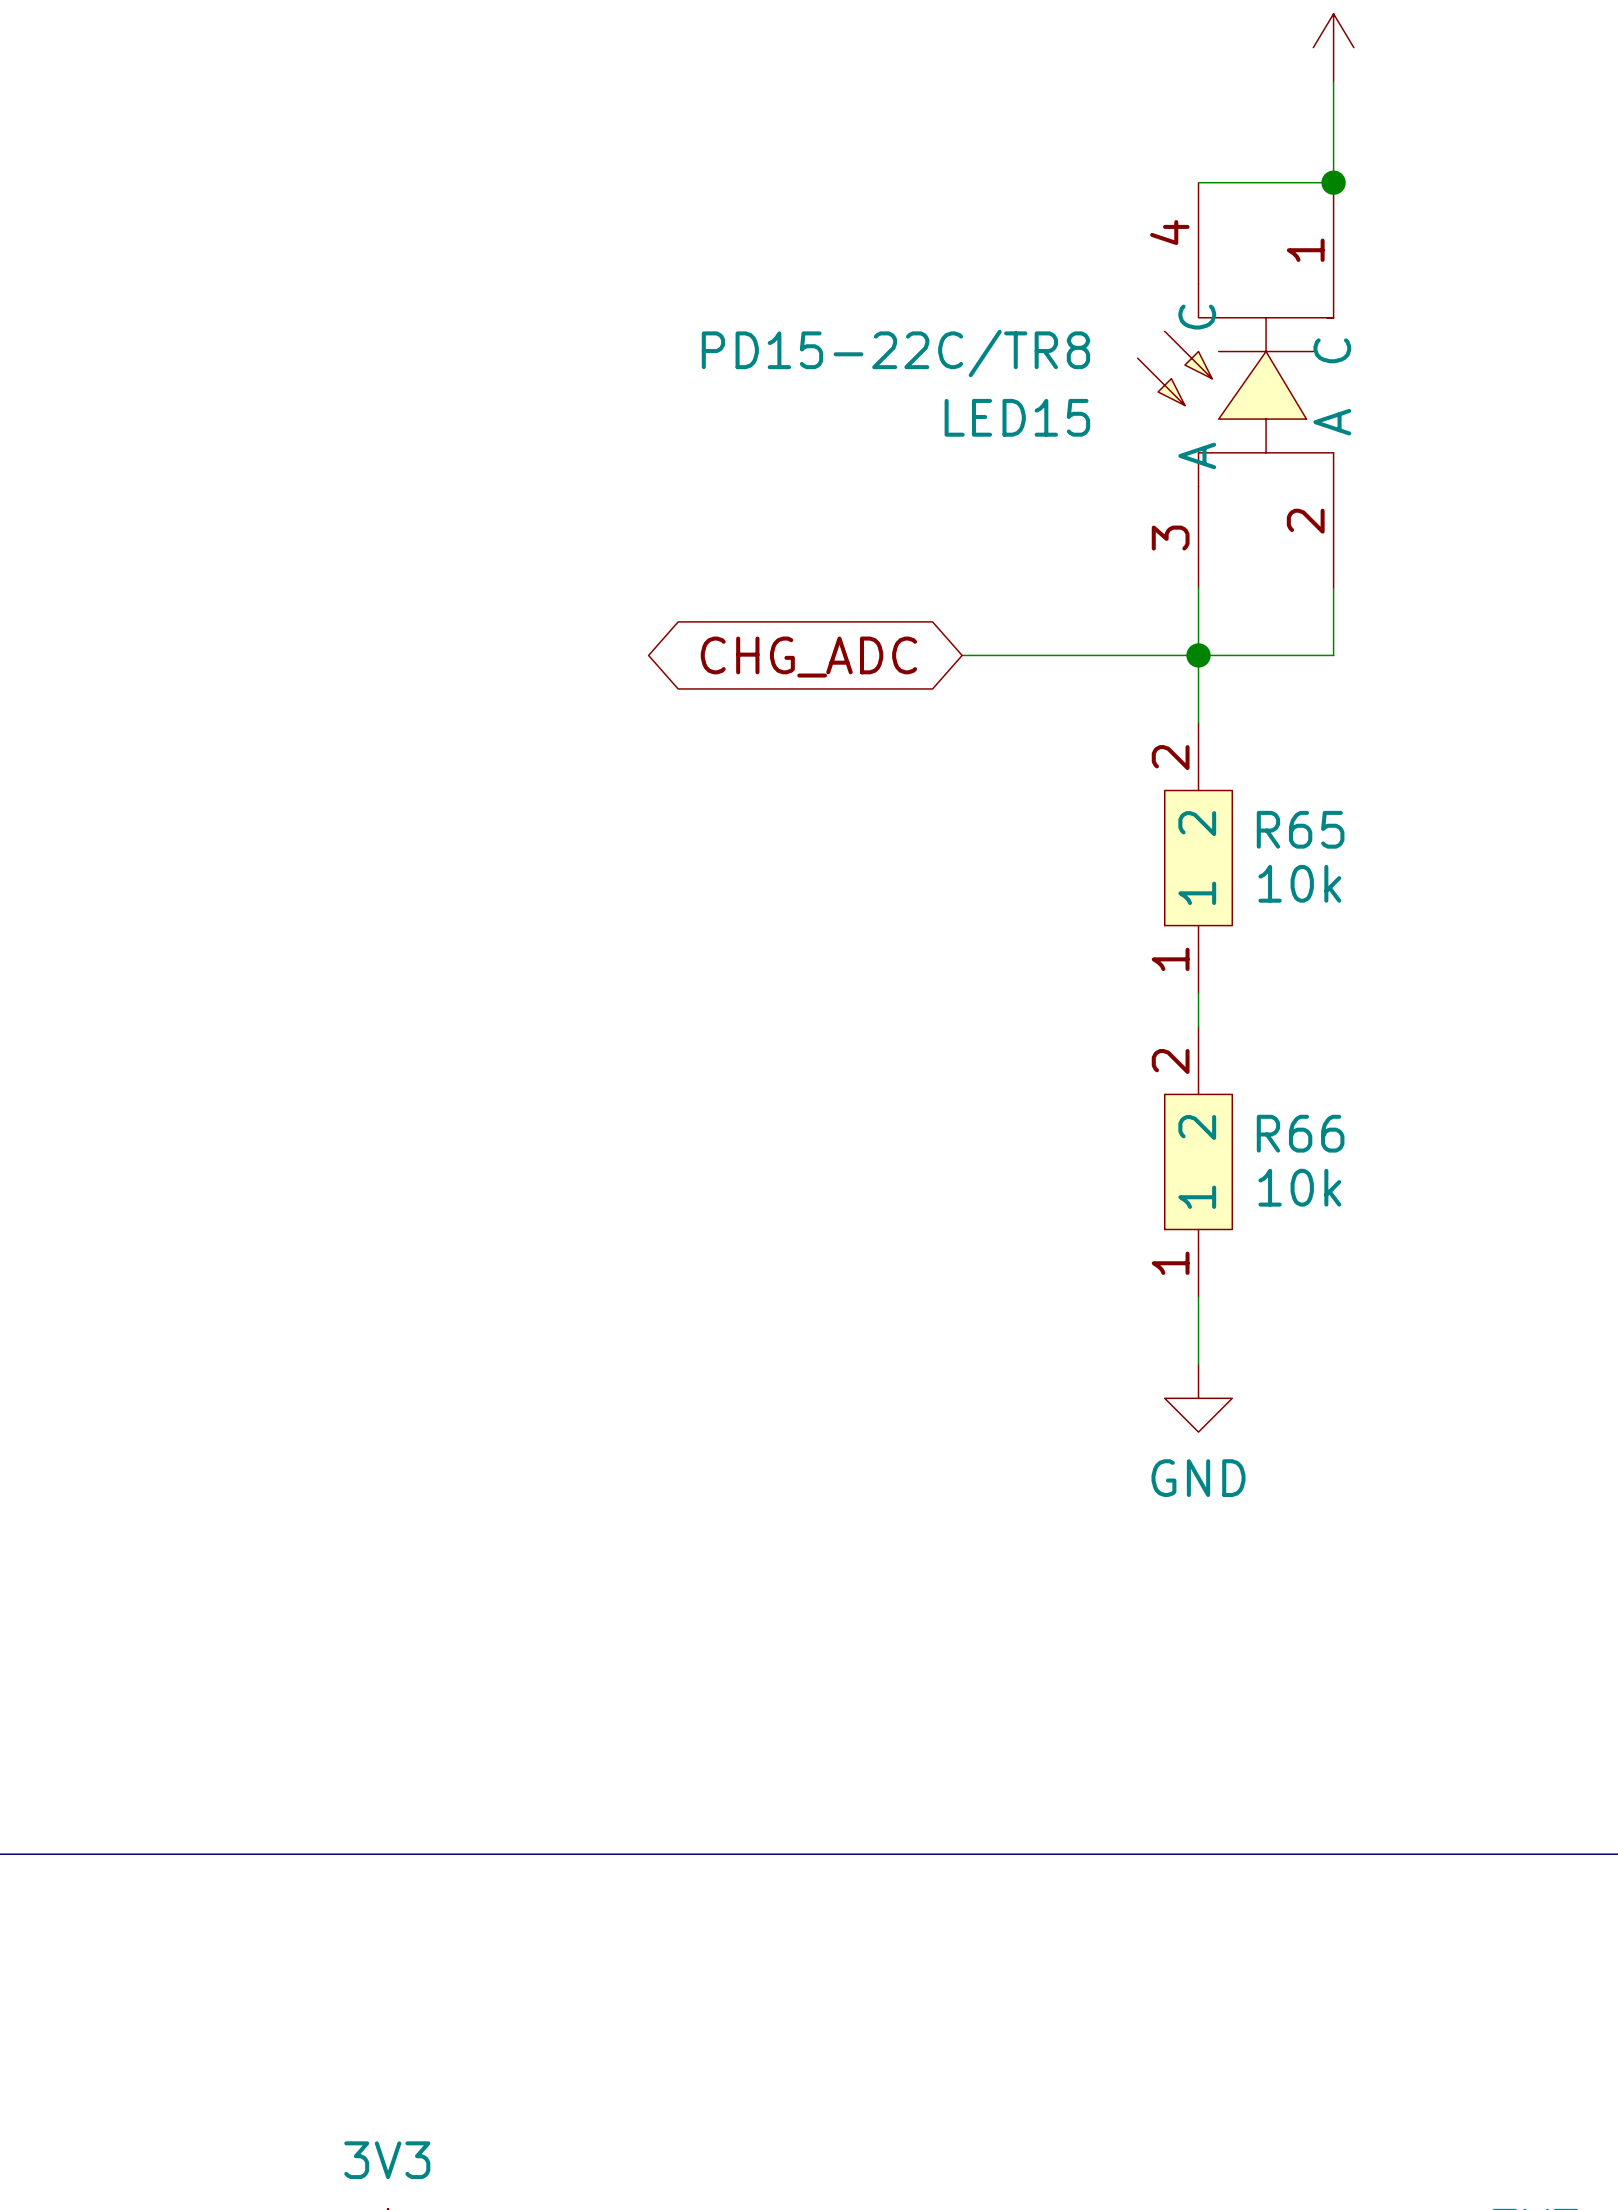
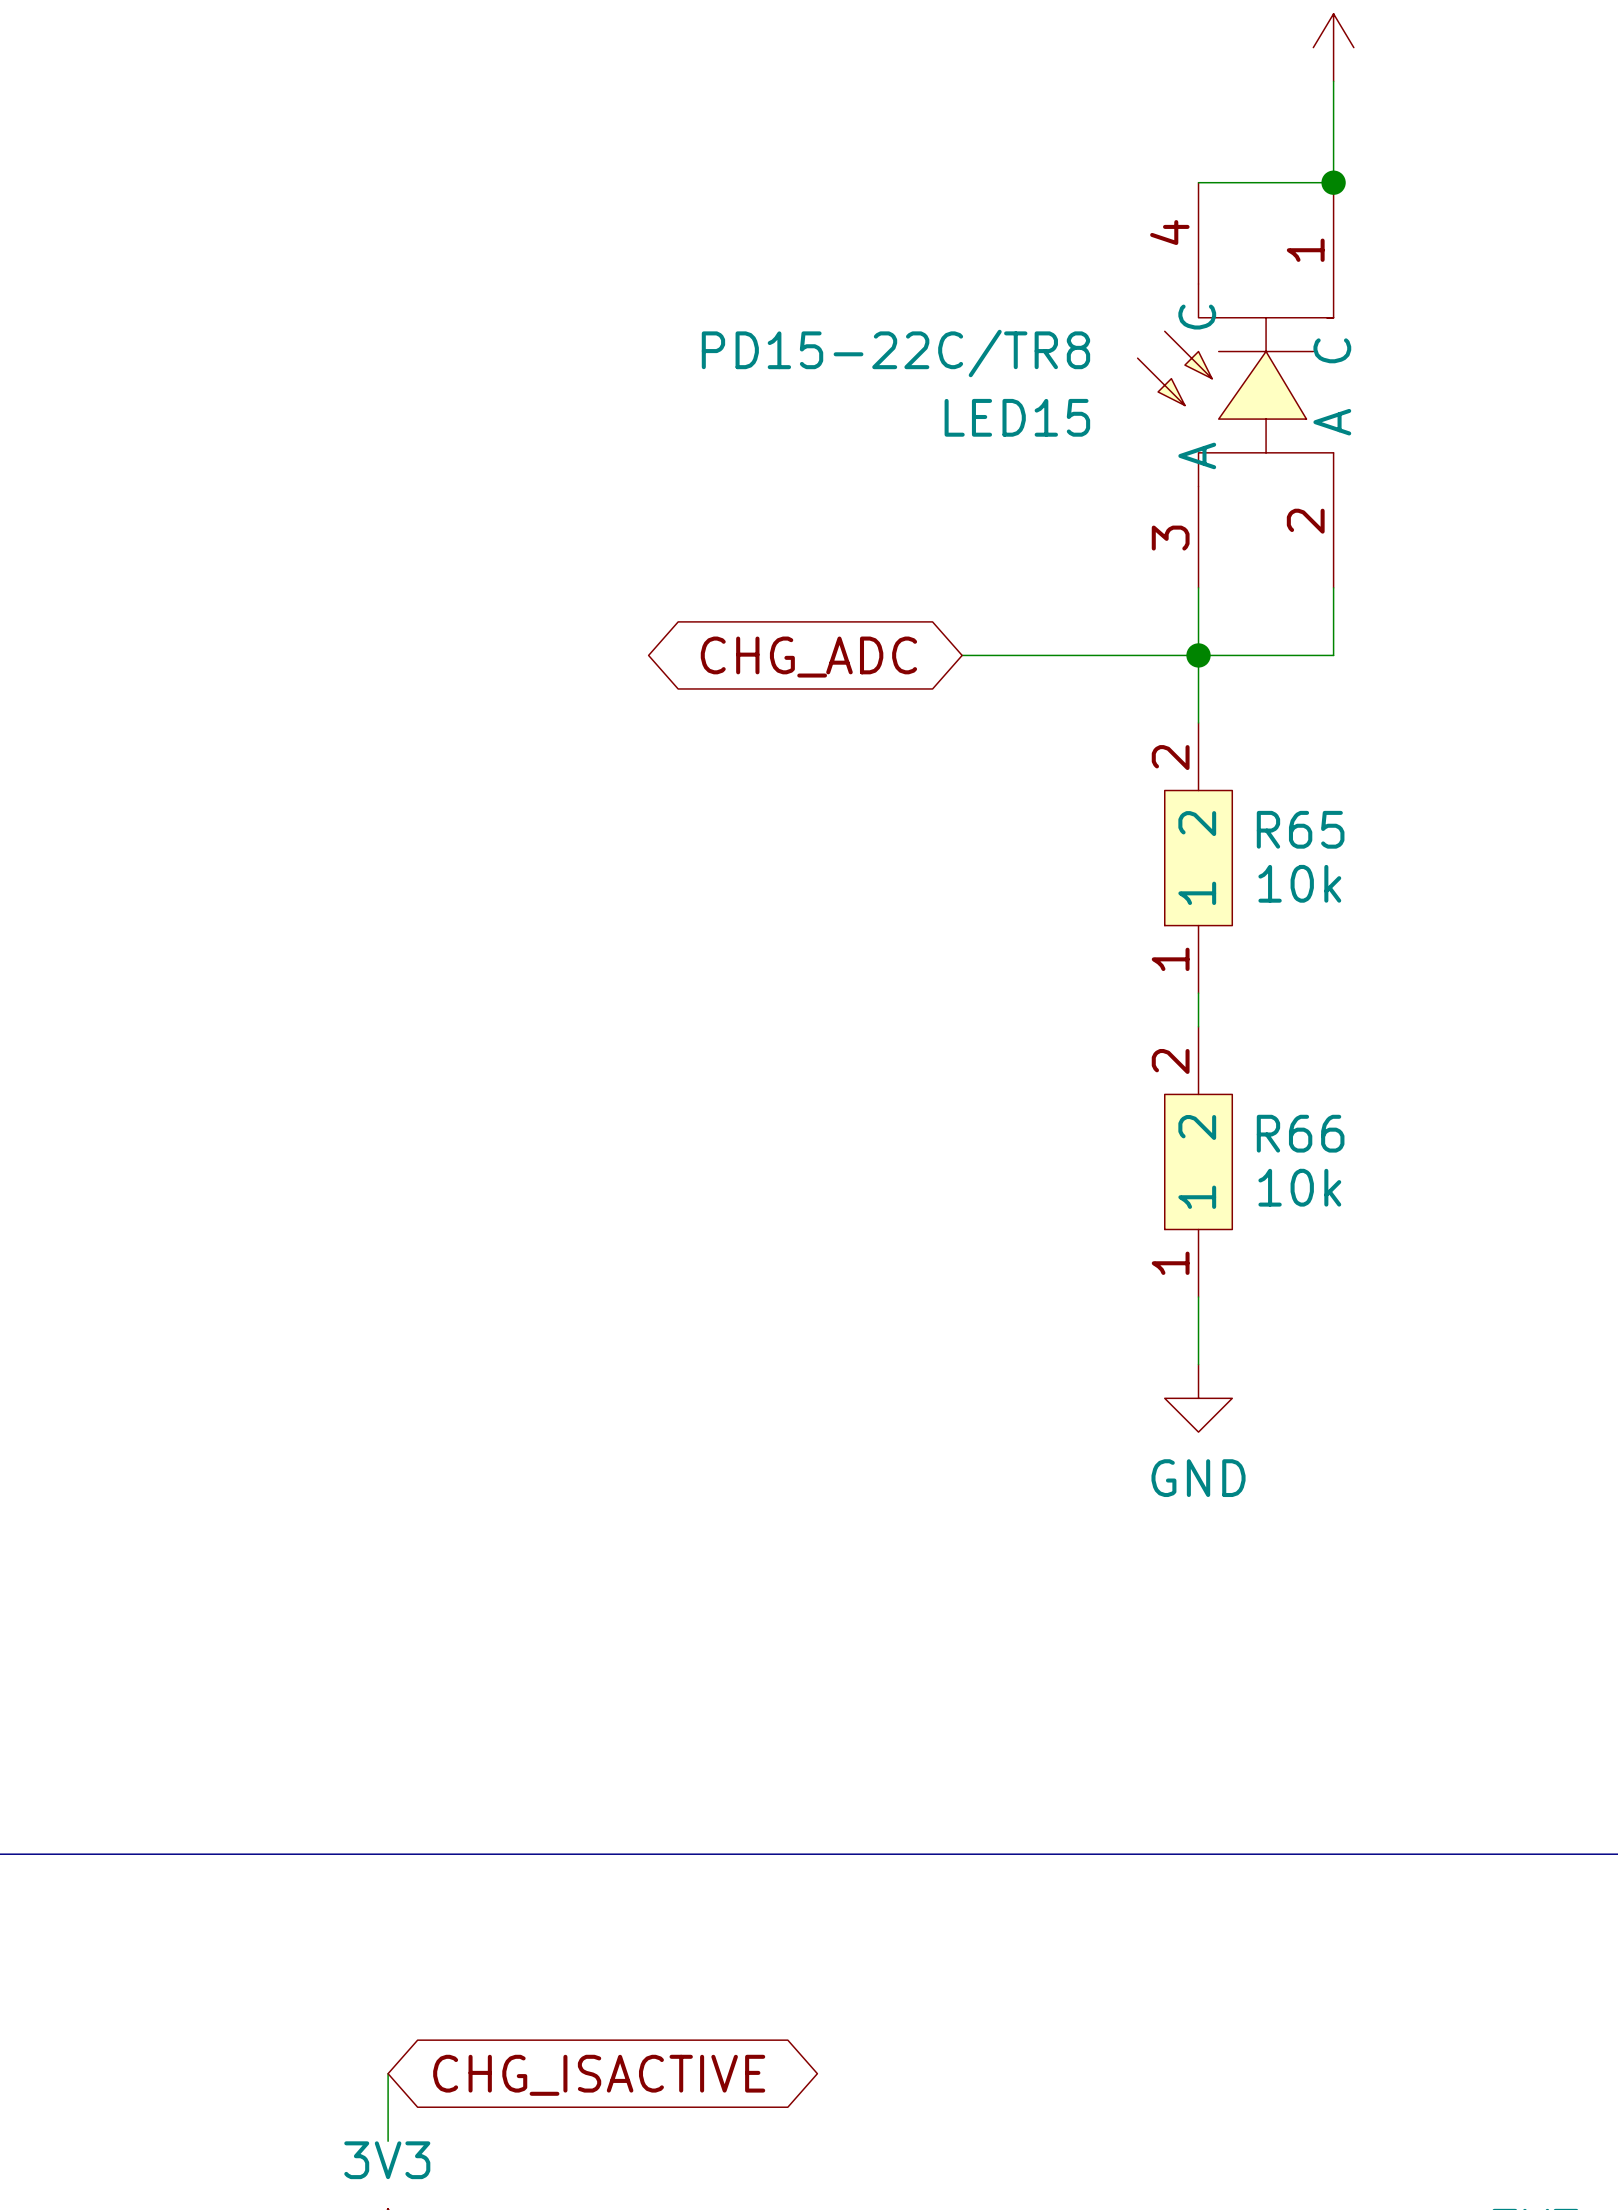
wire: none -> (388, 2073) (388, 2141)
global label: none -> CHG_ISACTIVE (599, 2075)

